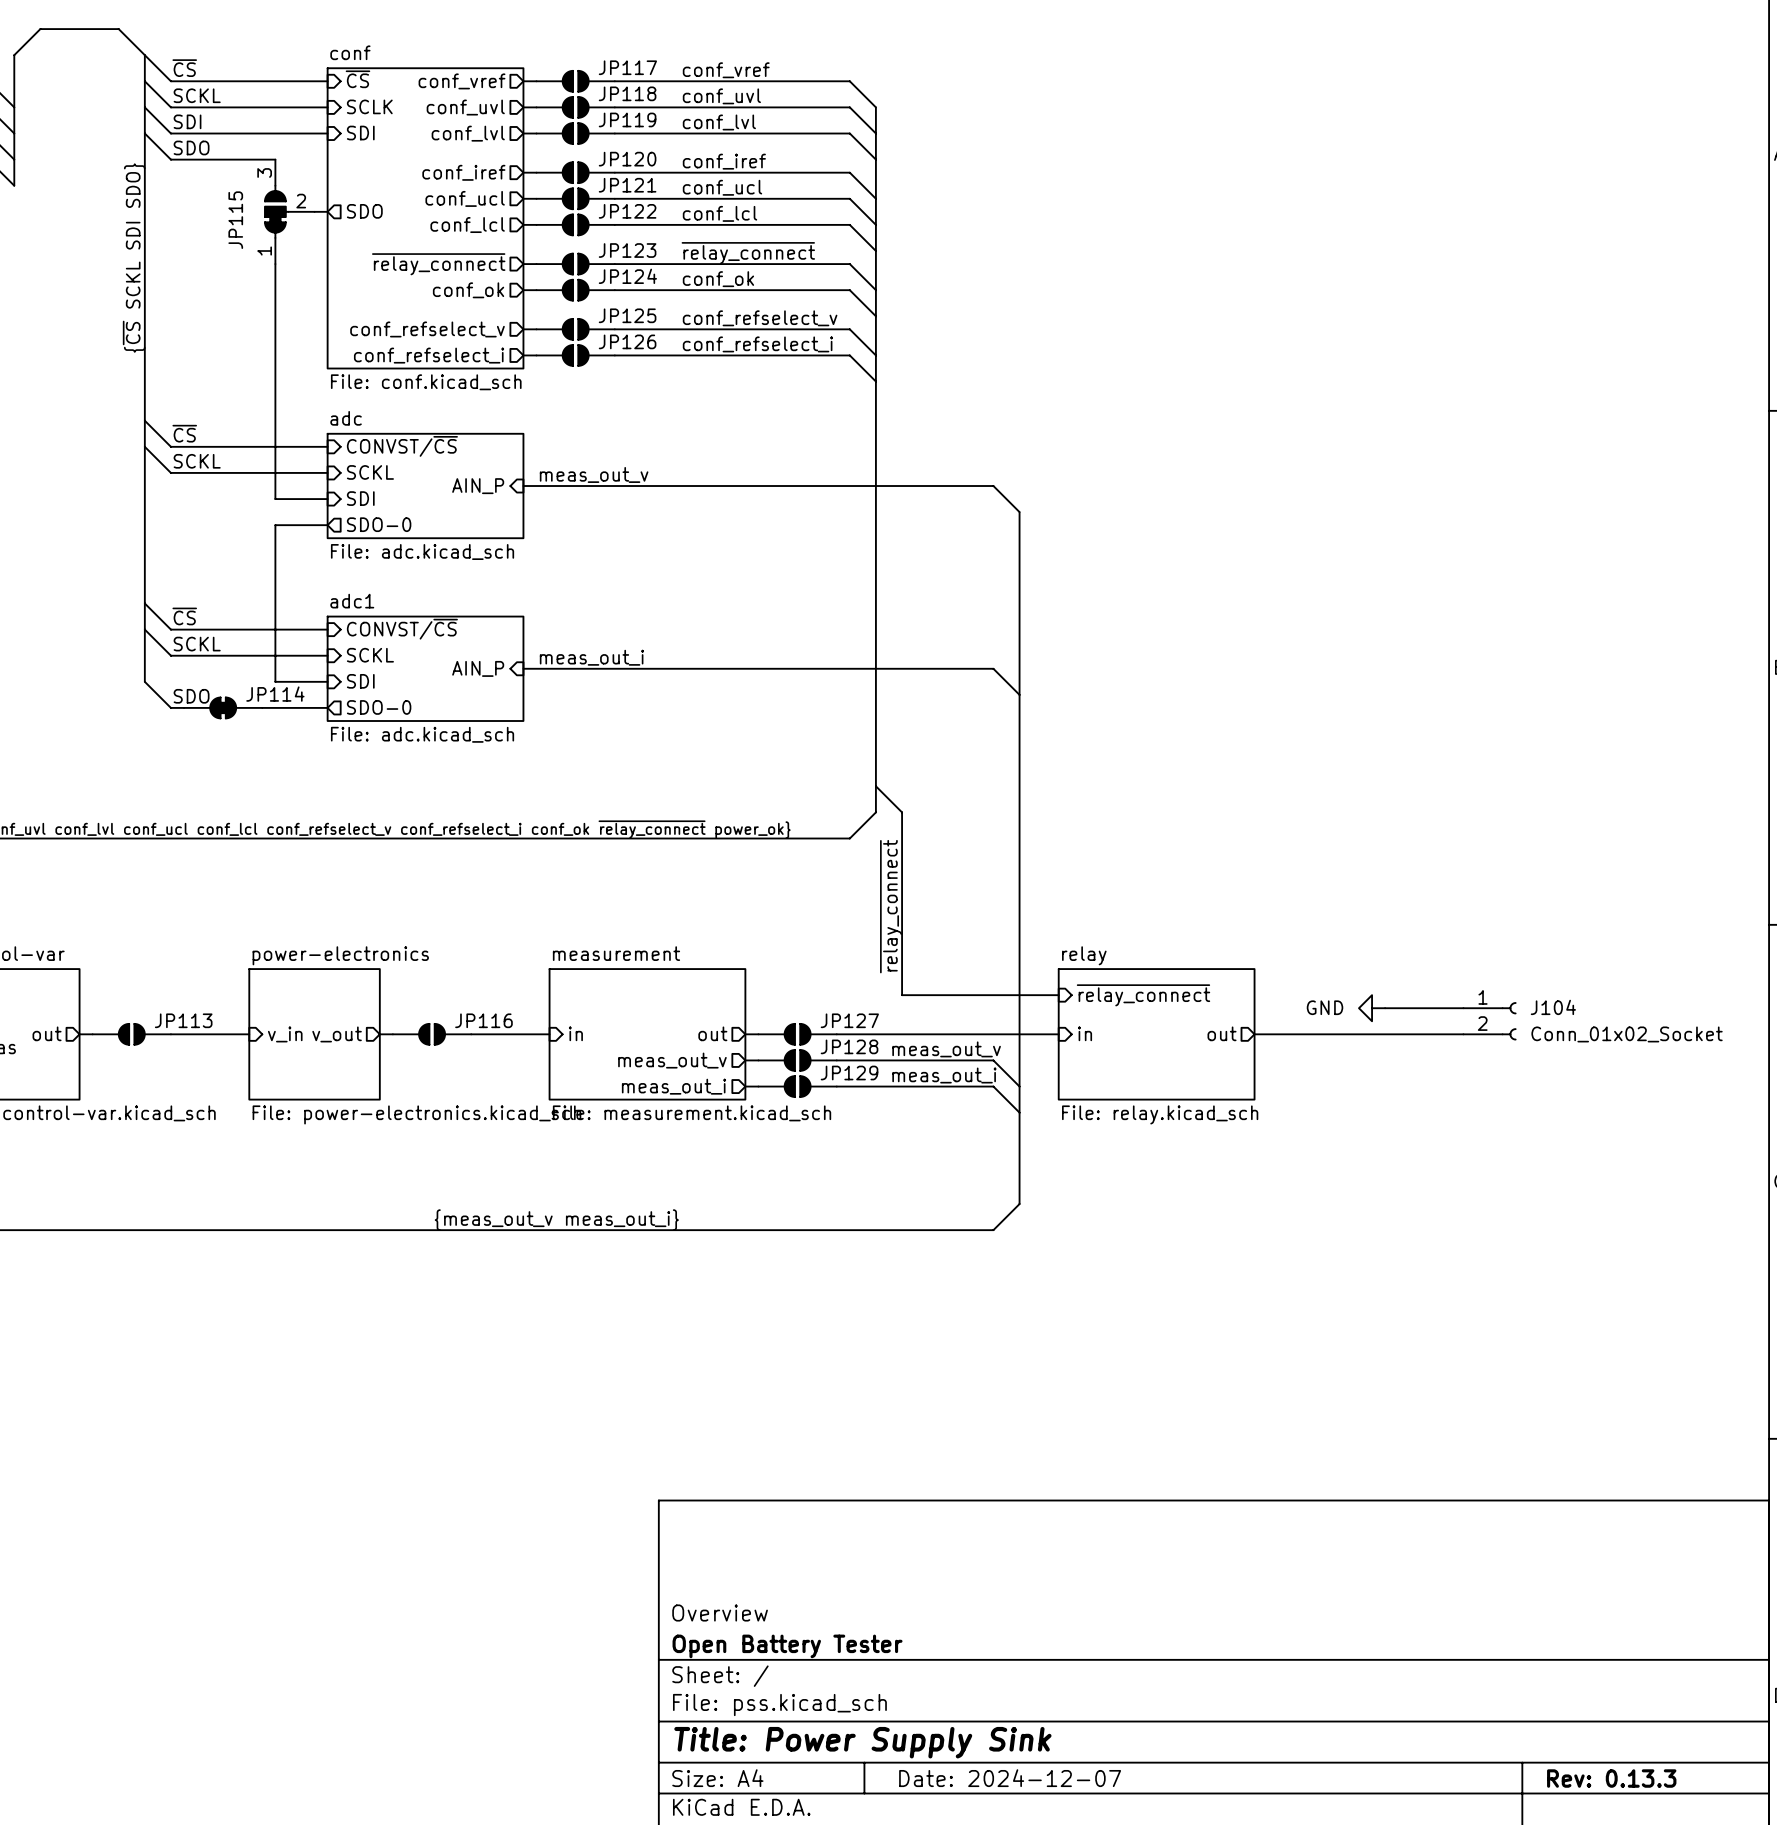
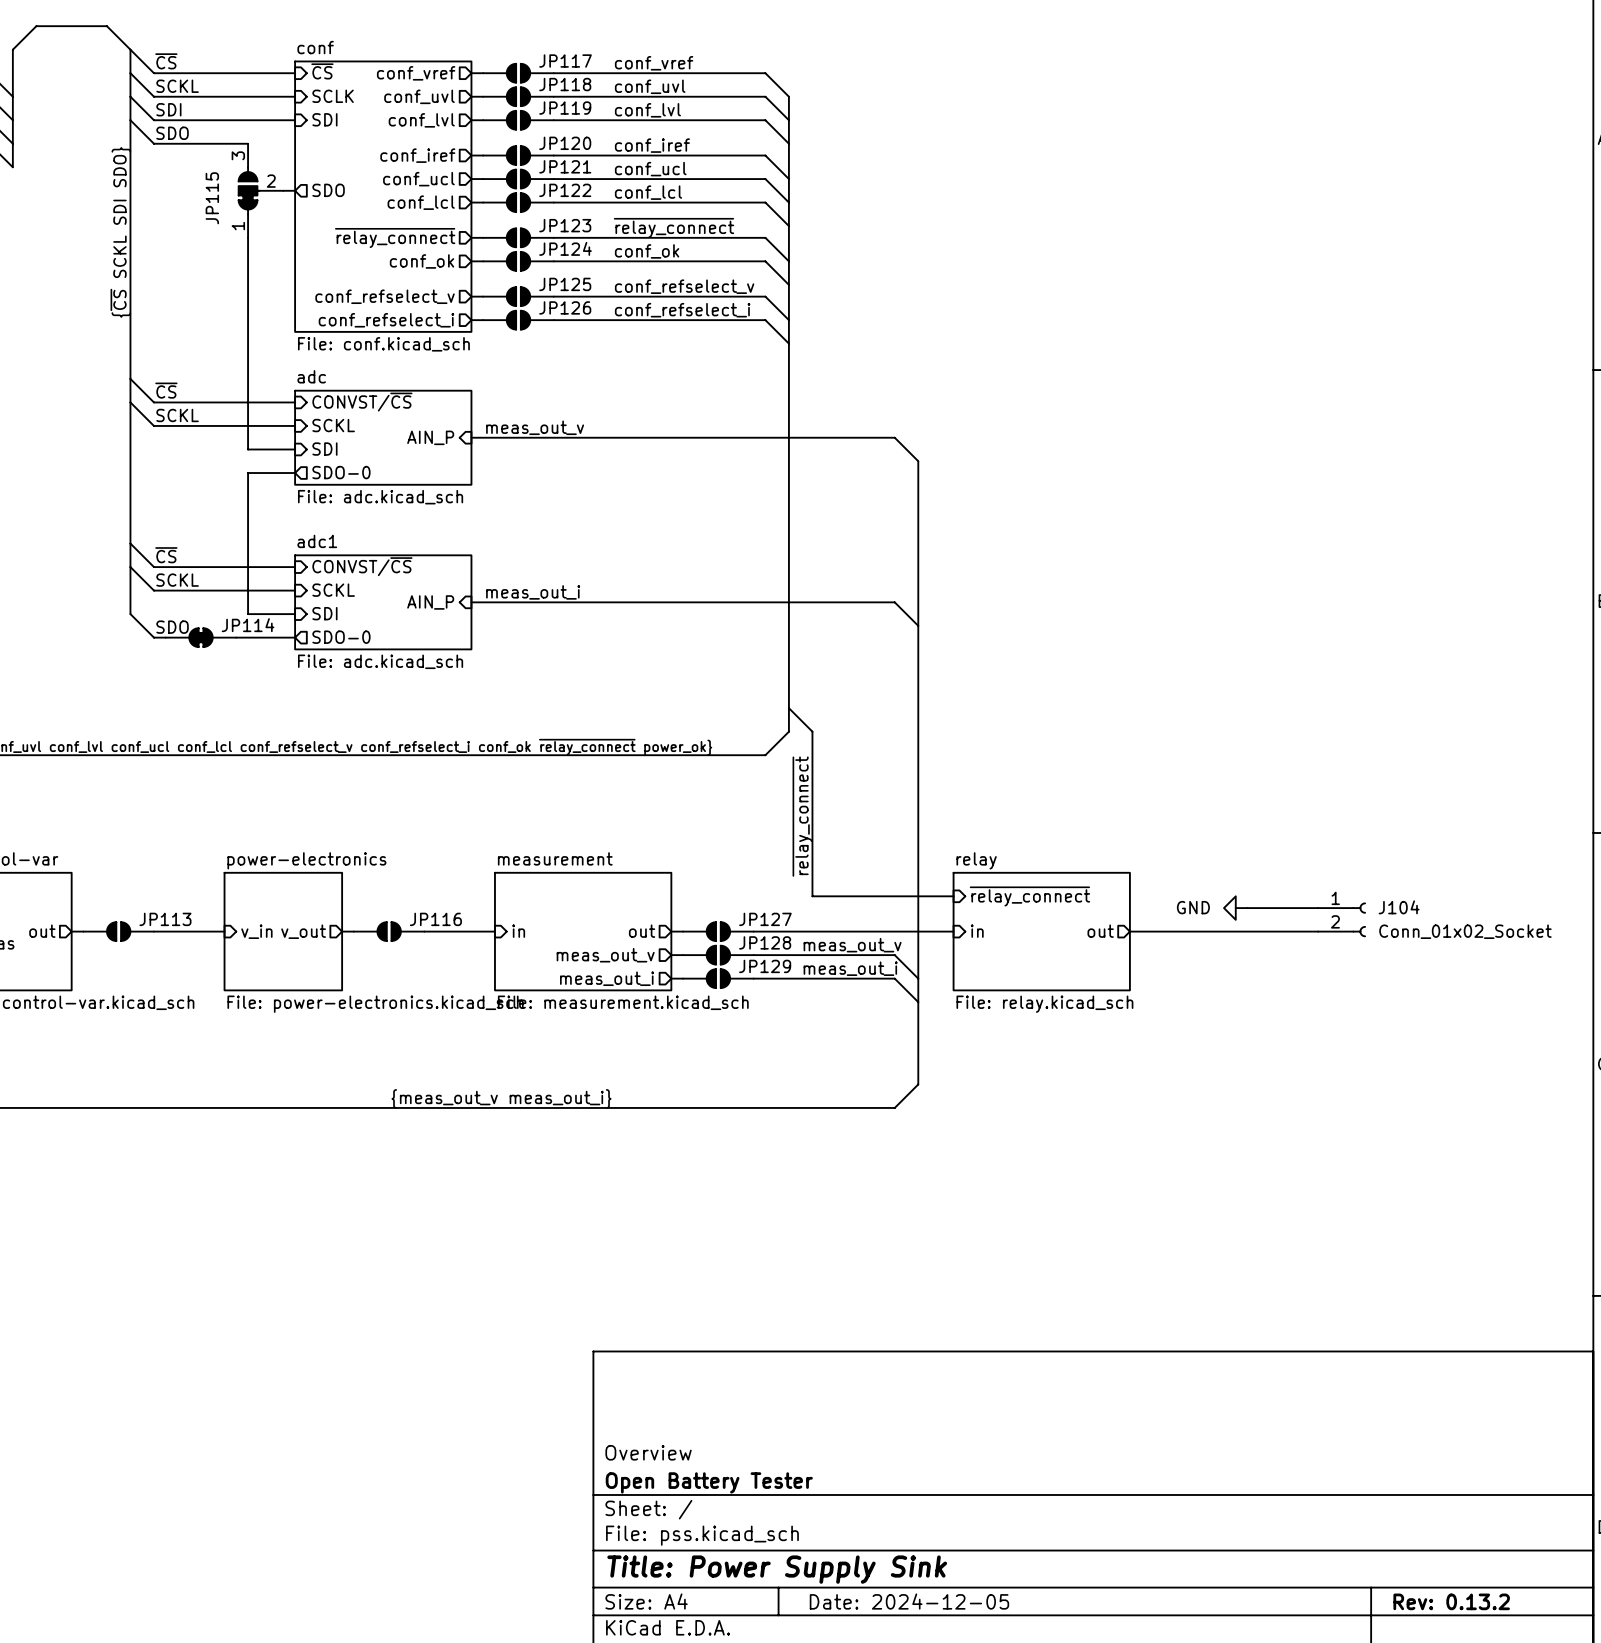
title block: Date: 2024-12-07 (1010, 1778) -> Date: 2024-12-05 (909, 1601)
title block: Rev: 0.13.3 (1611, 1778) -> Rev: 0.13.2 (1451, 1601)

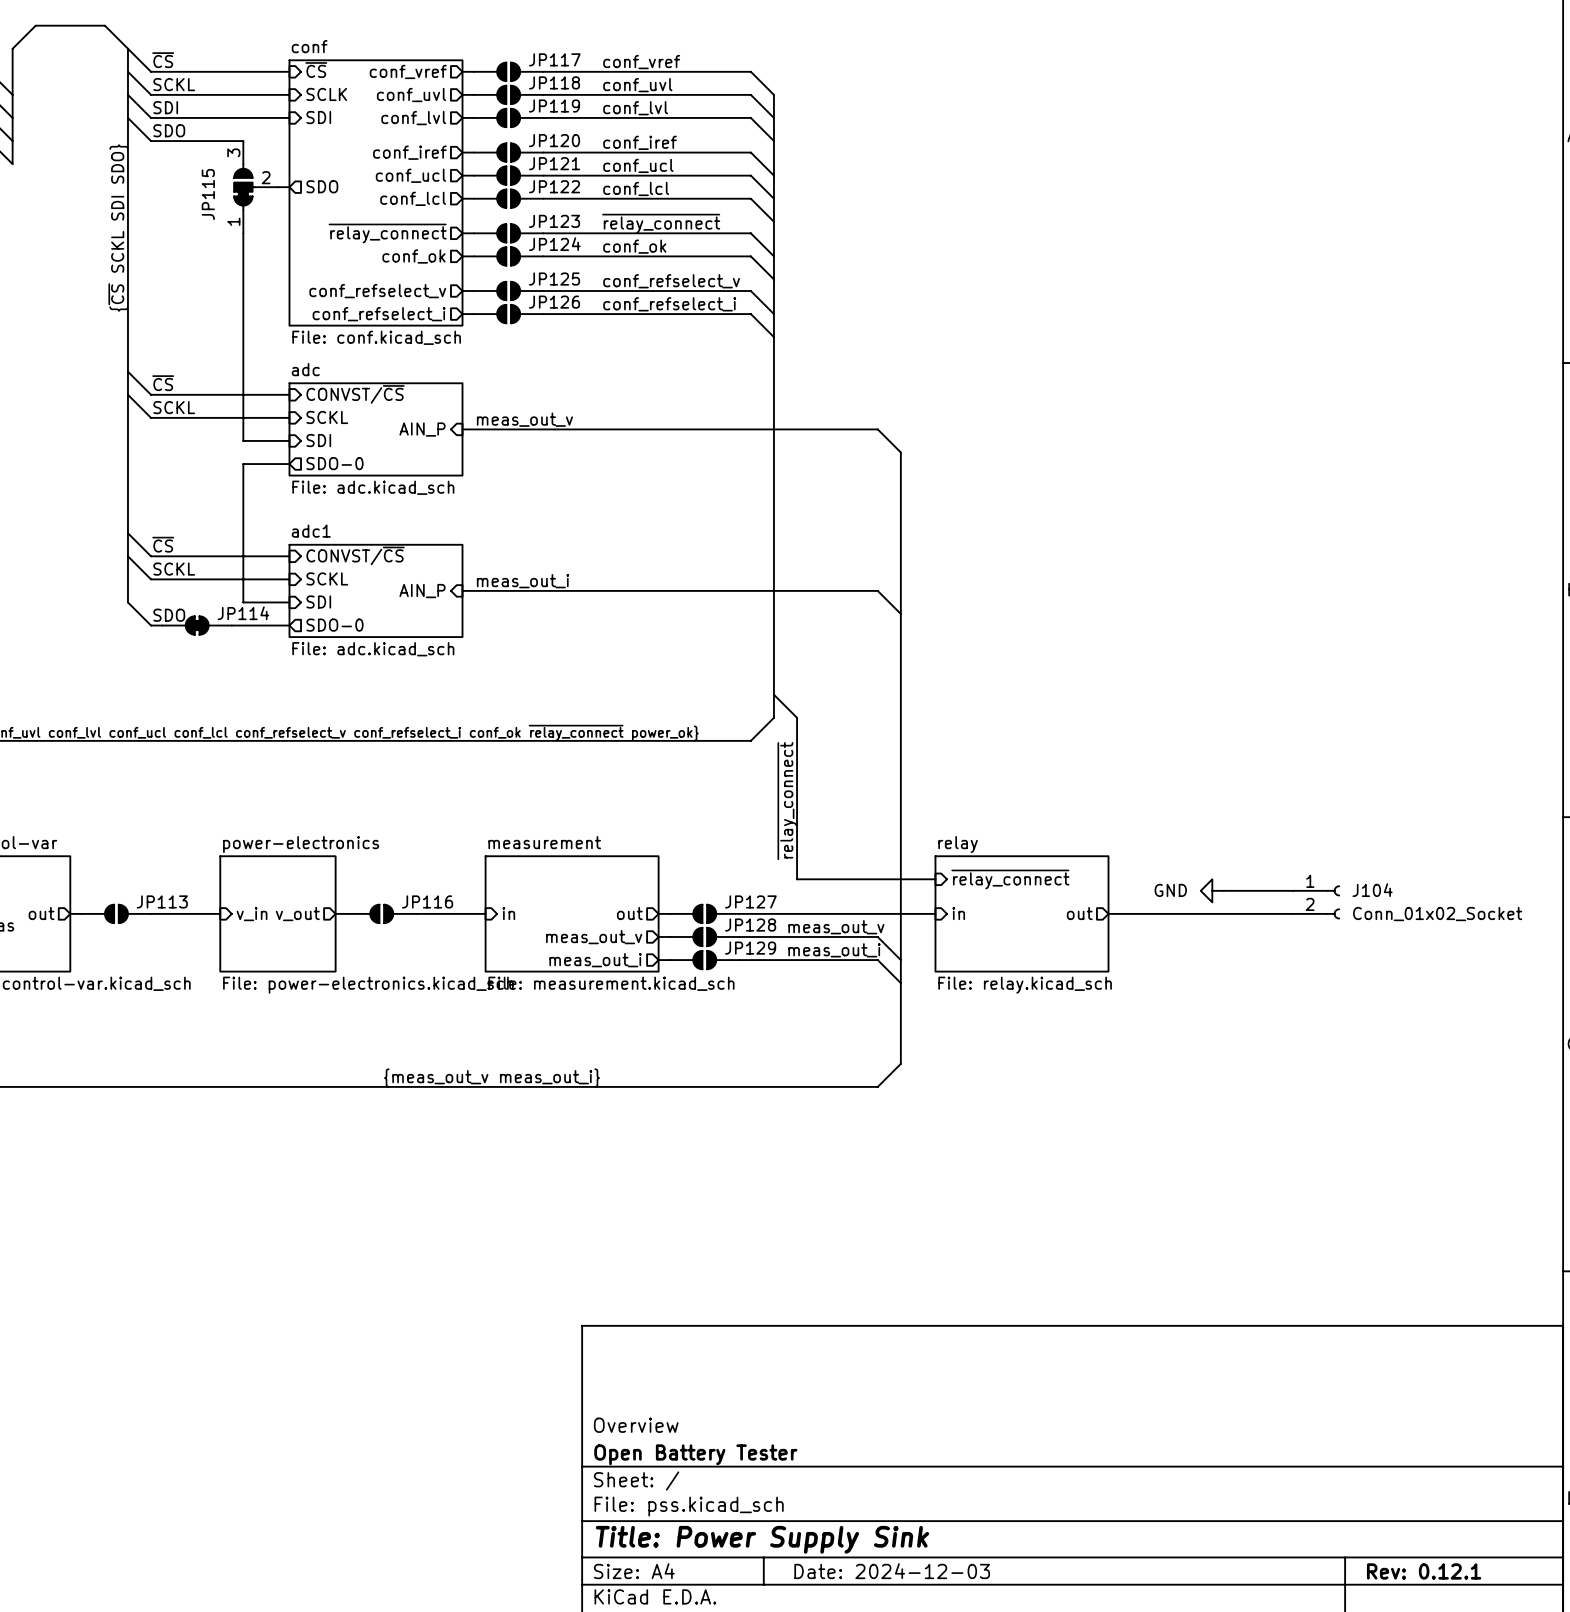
title block: Date: 2024-12-05 (909, 1601) -> Date: 2024-12-03 (892, 1571)
title block: Rev: 0.13.2 (1451, 1601) -> Rev: 0.12.1 (1424, 1571)

